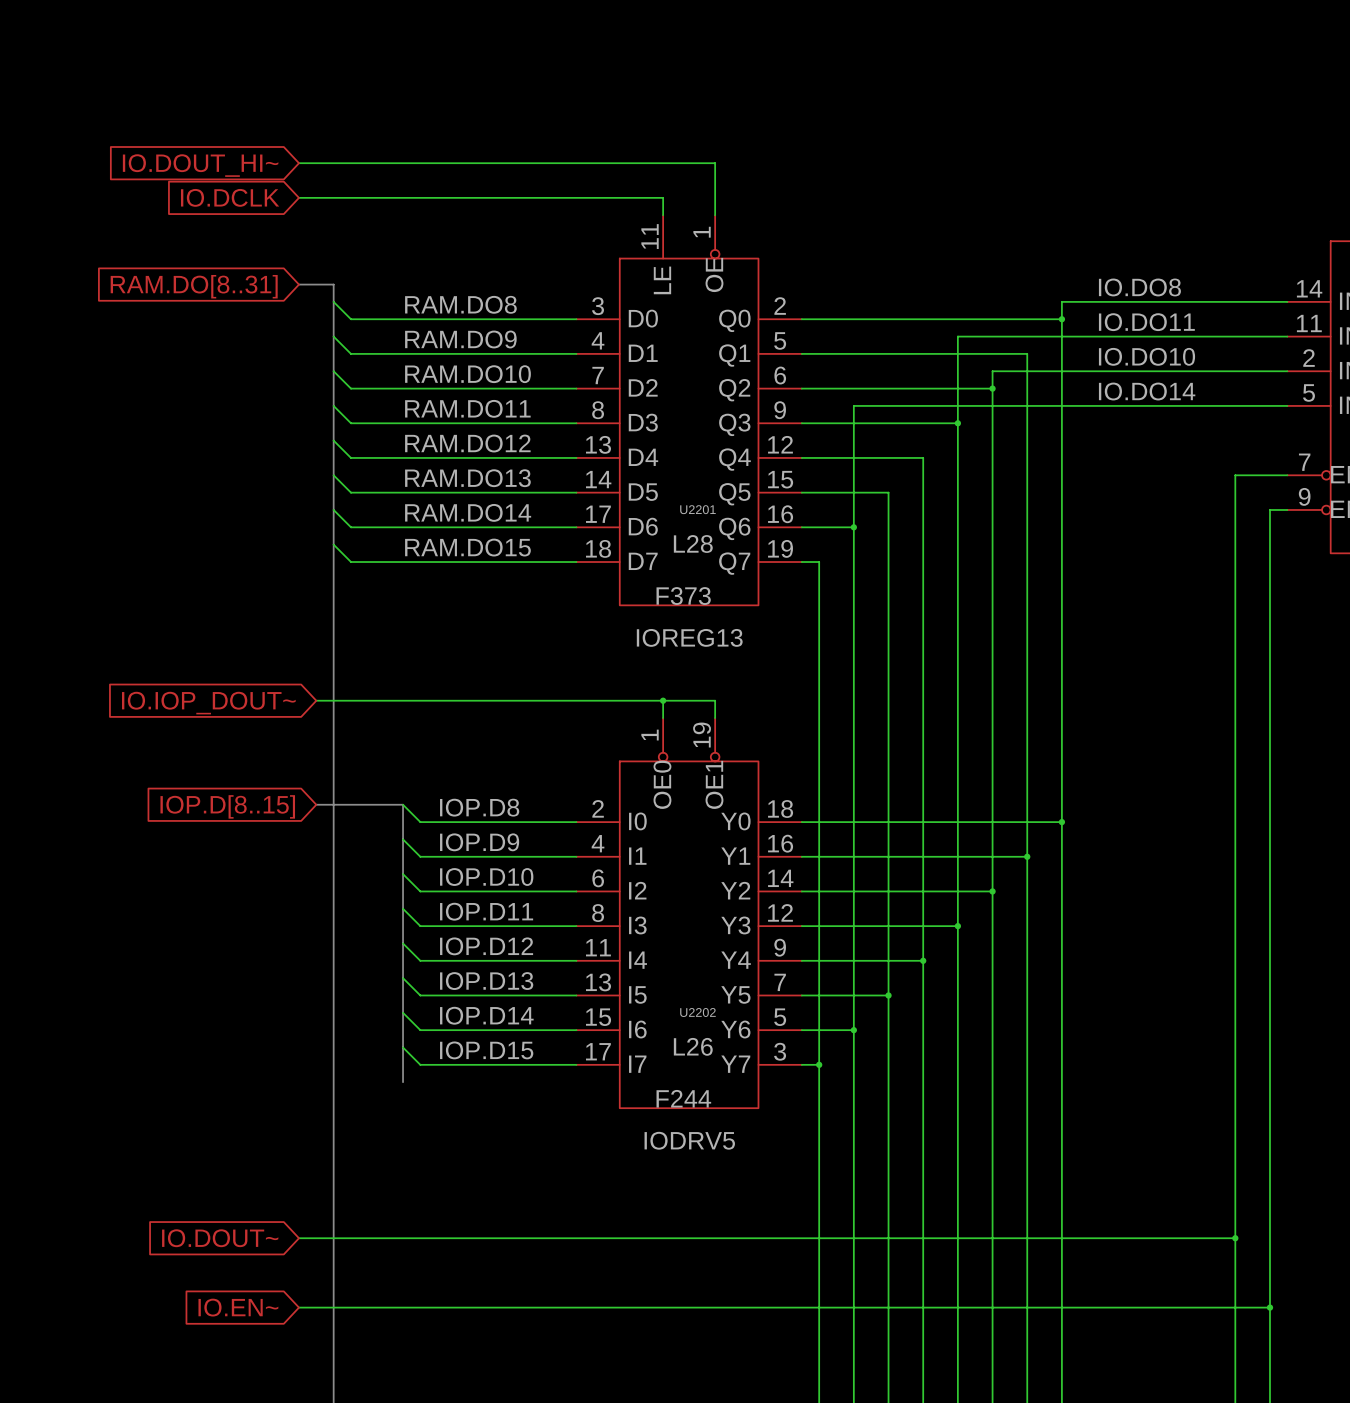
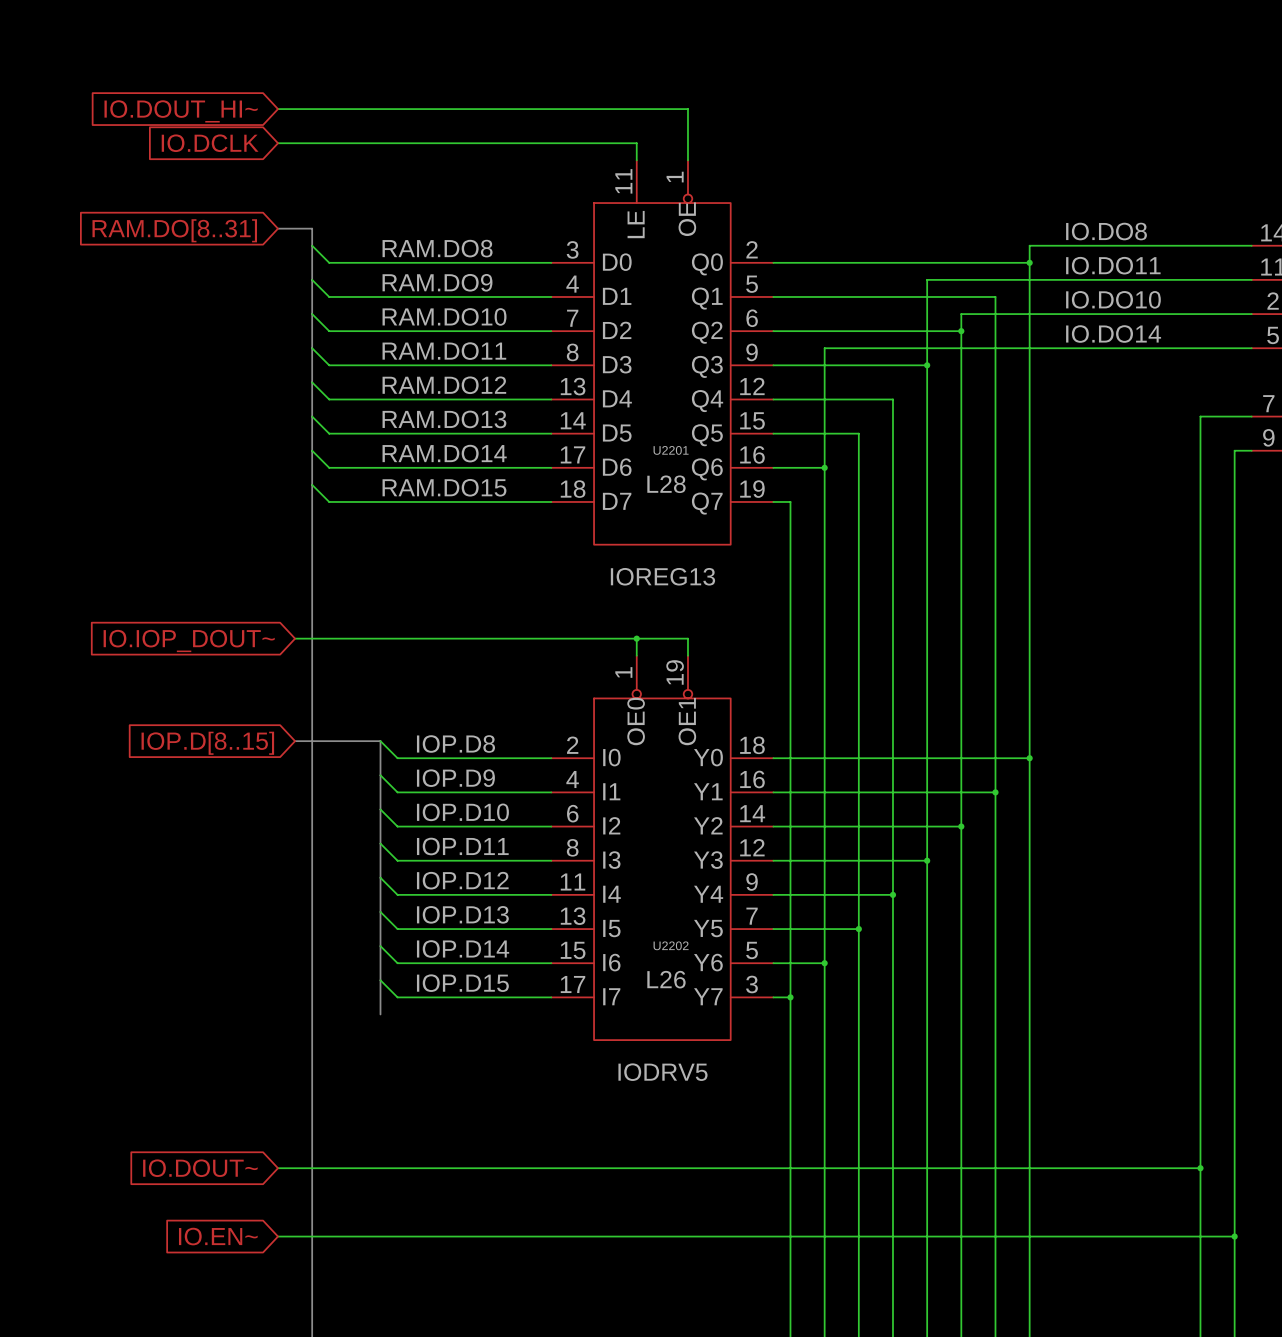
U2201 value: F373 (683, 596) -> none
U2202 value: F244 (683, 1098) -> none

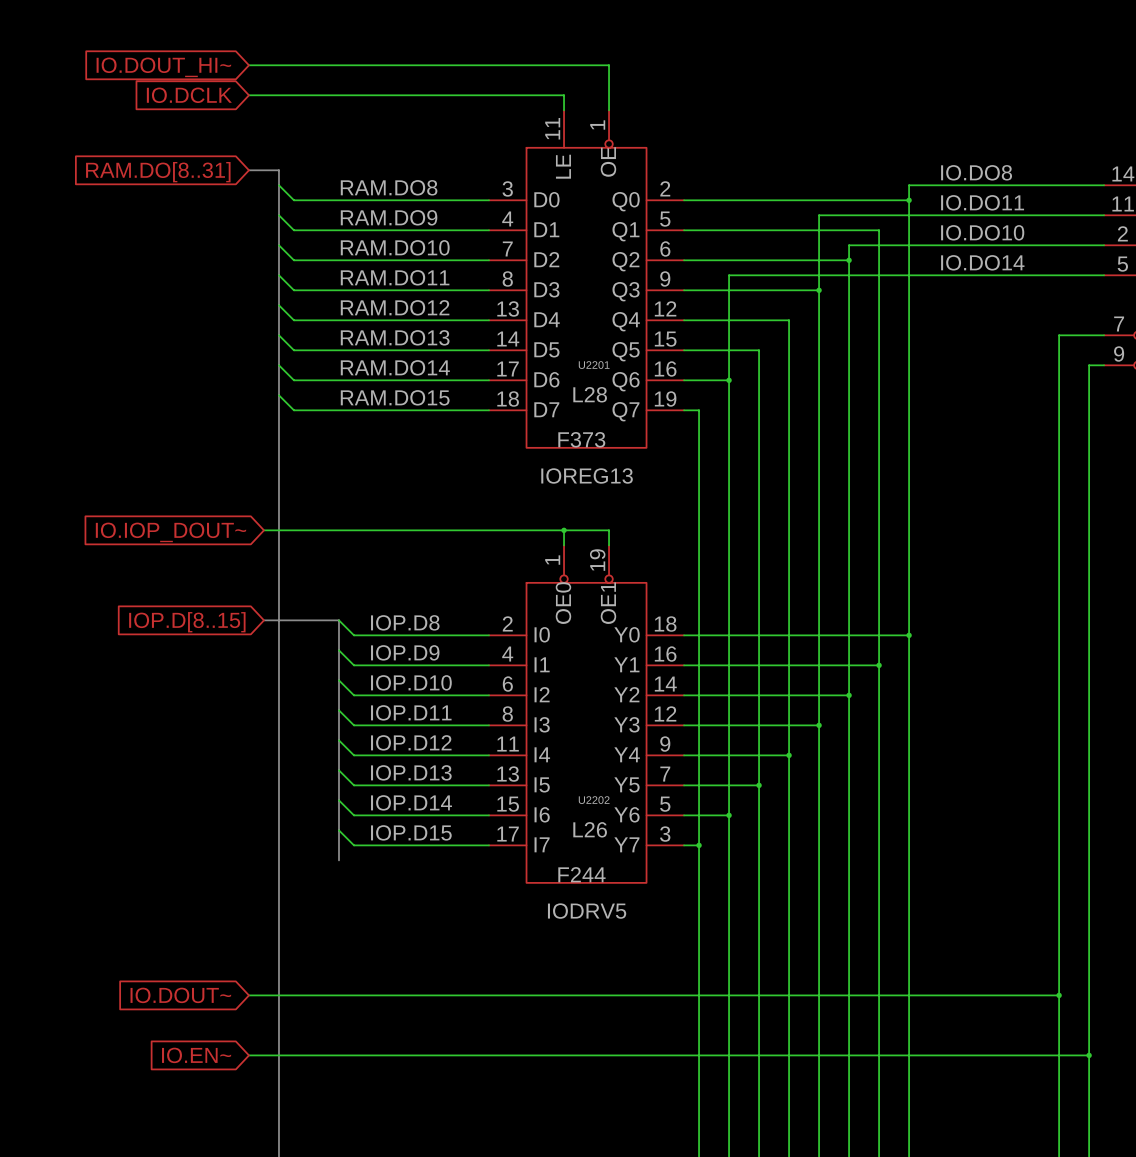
U2201 value: none -> F373 (581, 439)
U2202 value: none -> F244 (581, 874)

